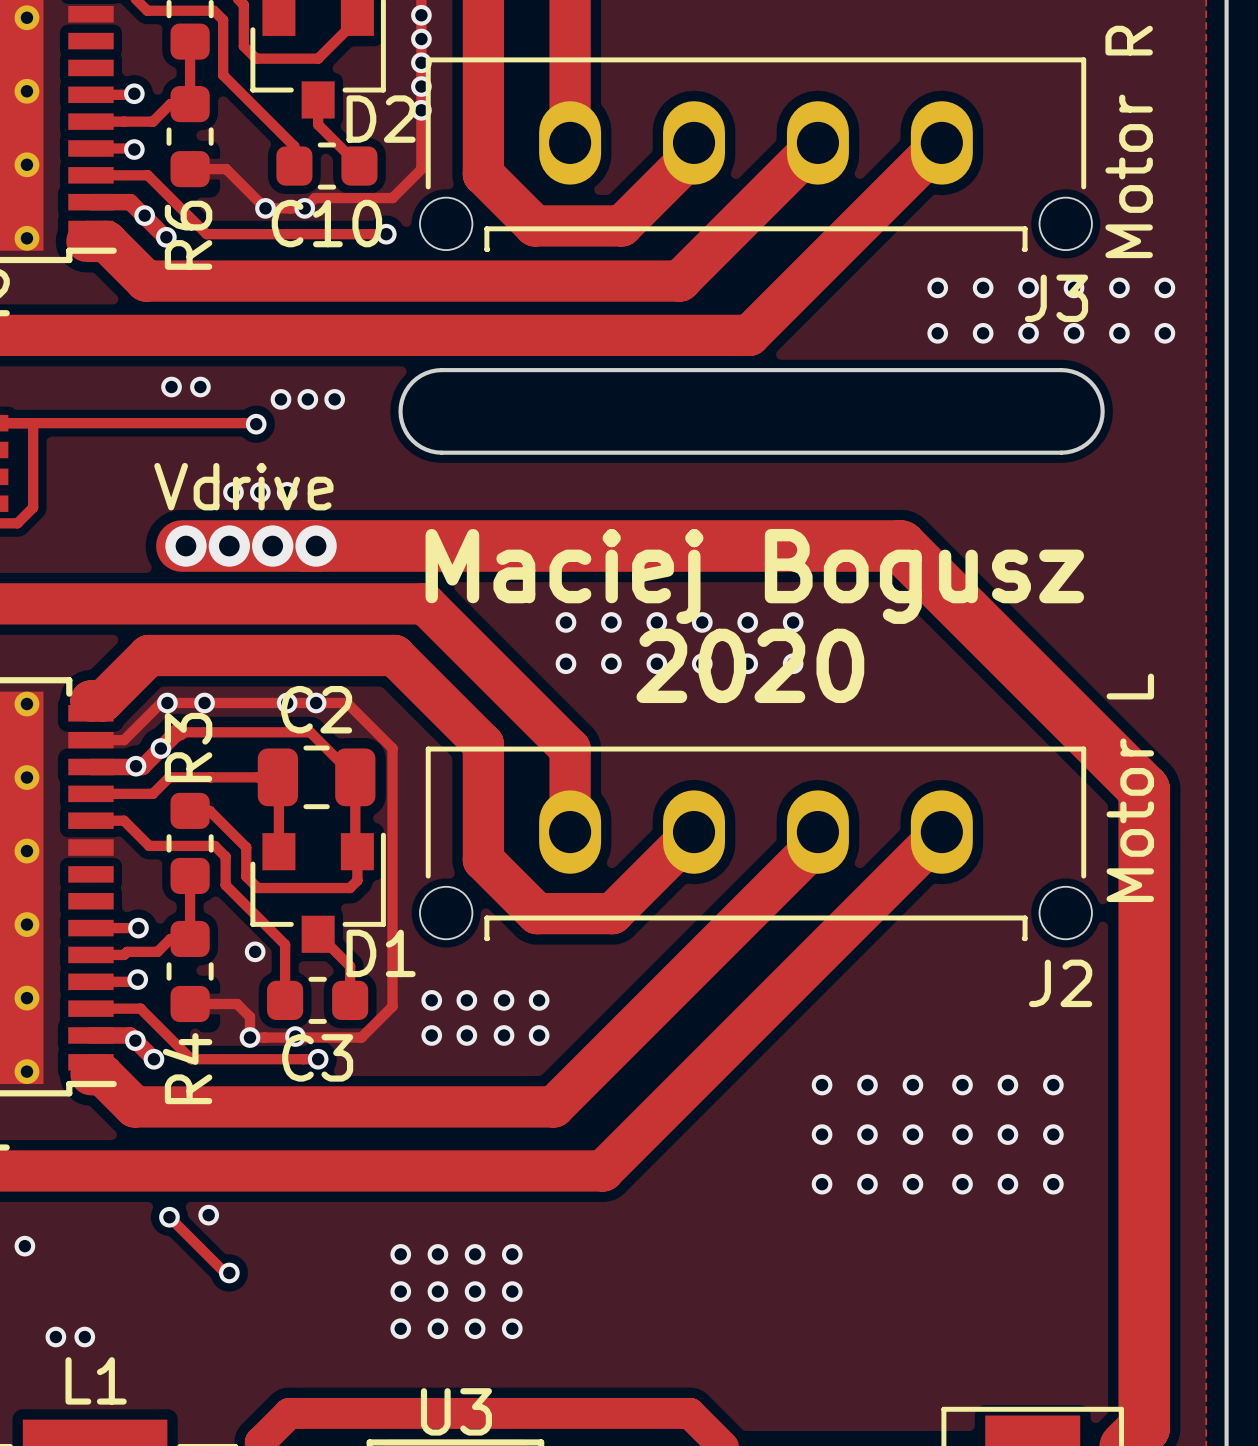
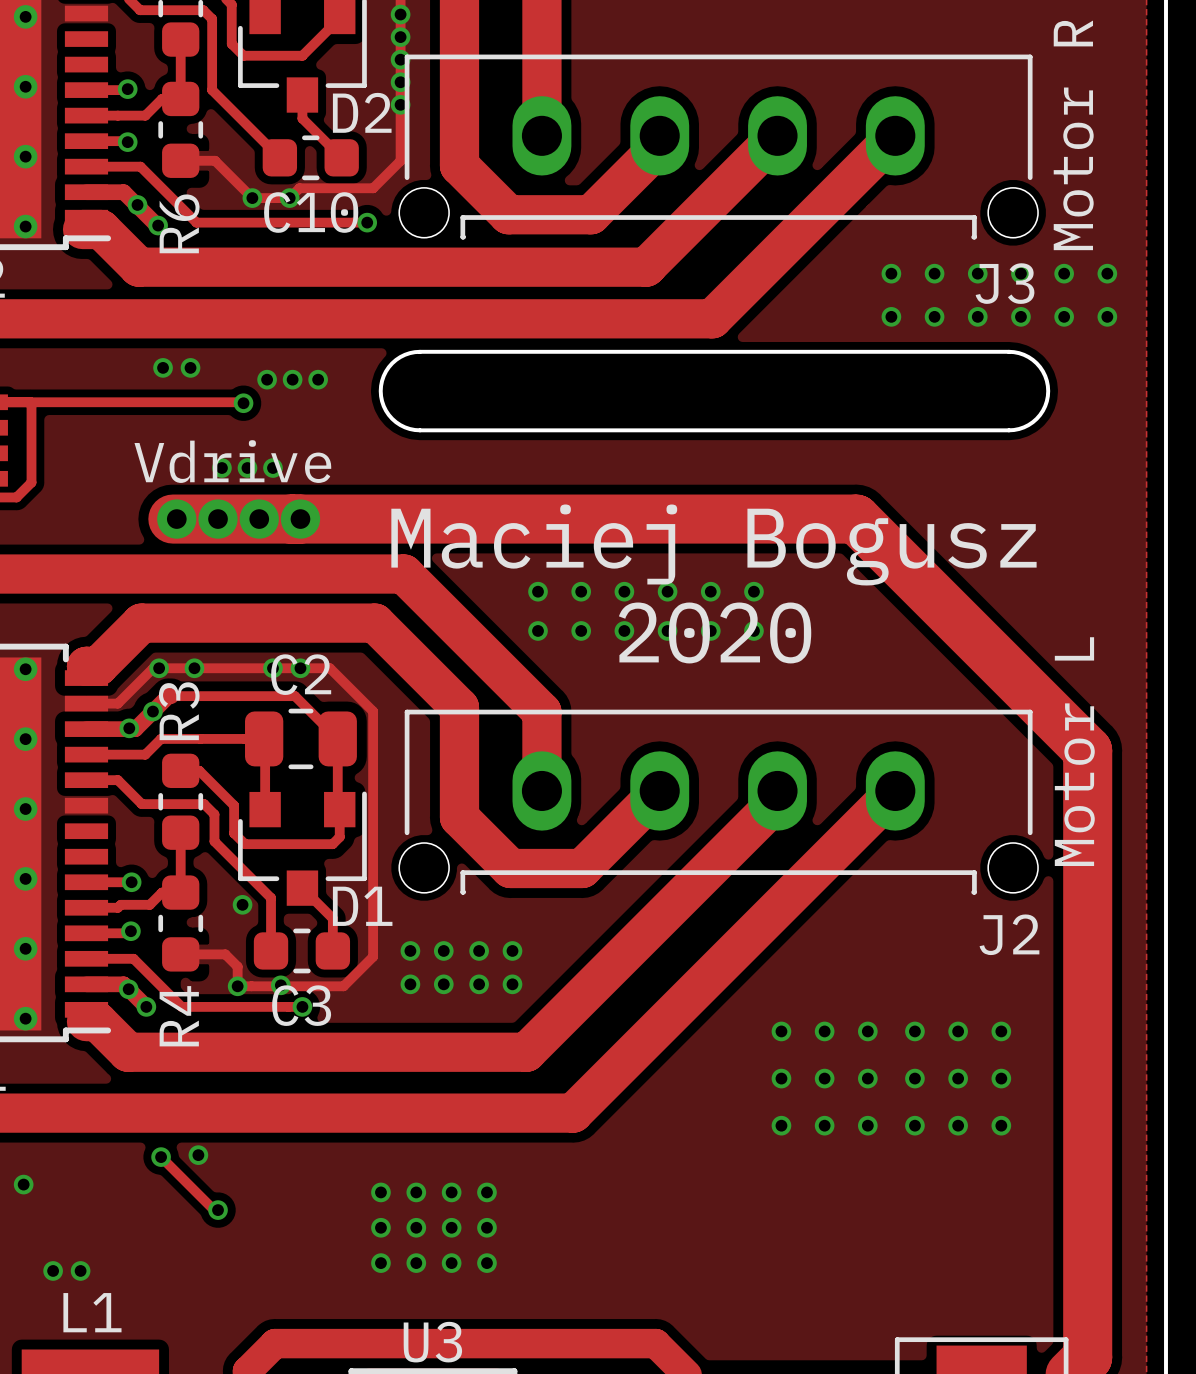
track: (223, 75) (294, 146) (294, 166) -> (212, 71) (212, 90) (279, 157)

